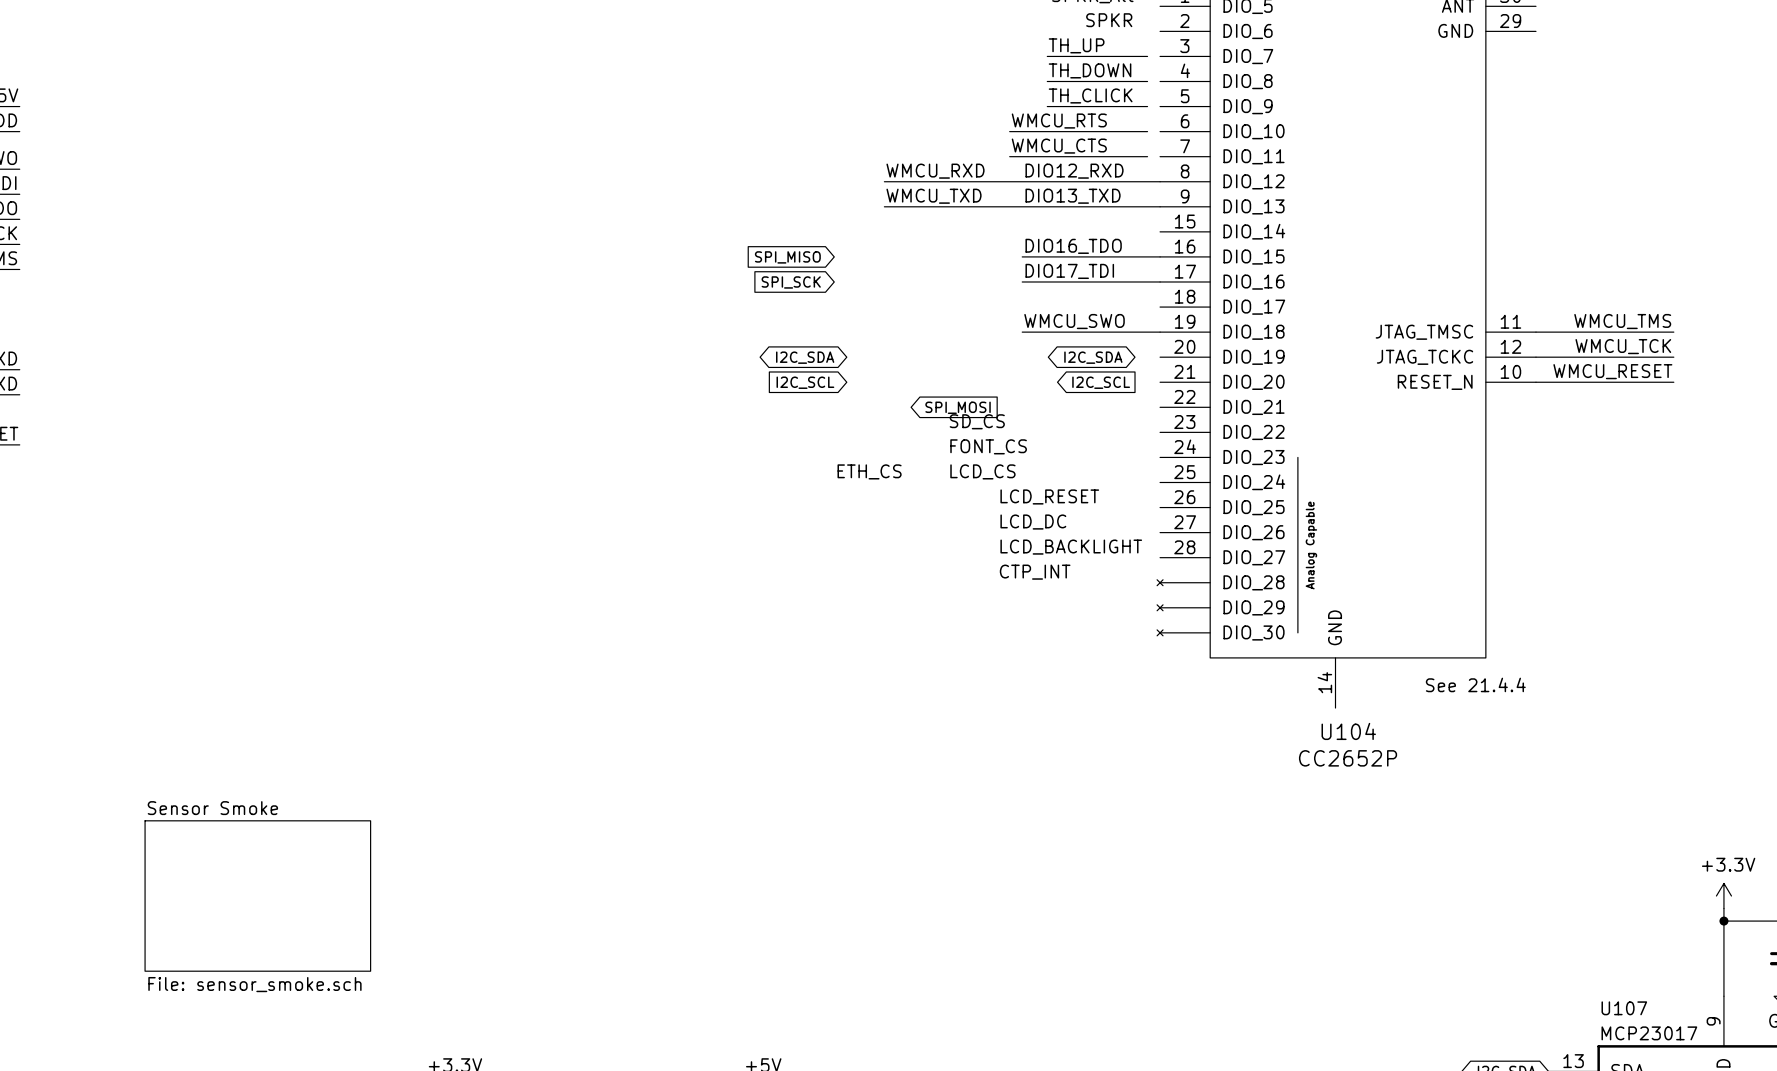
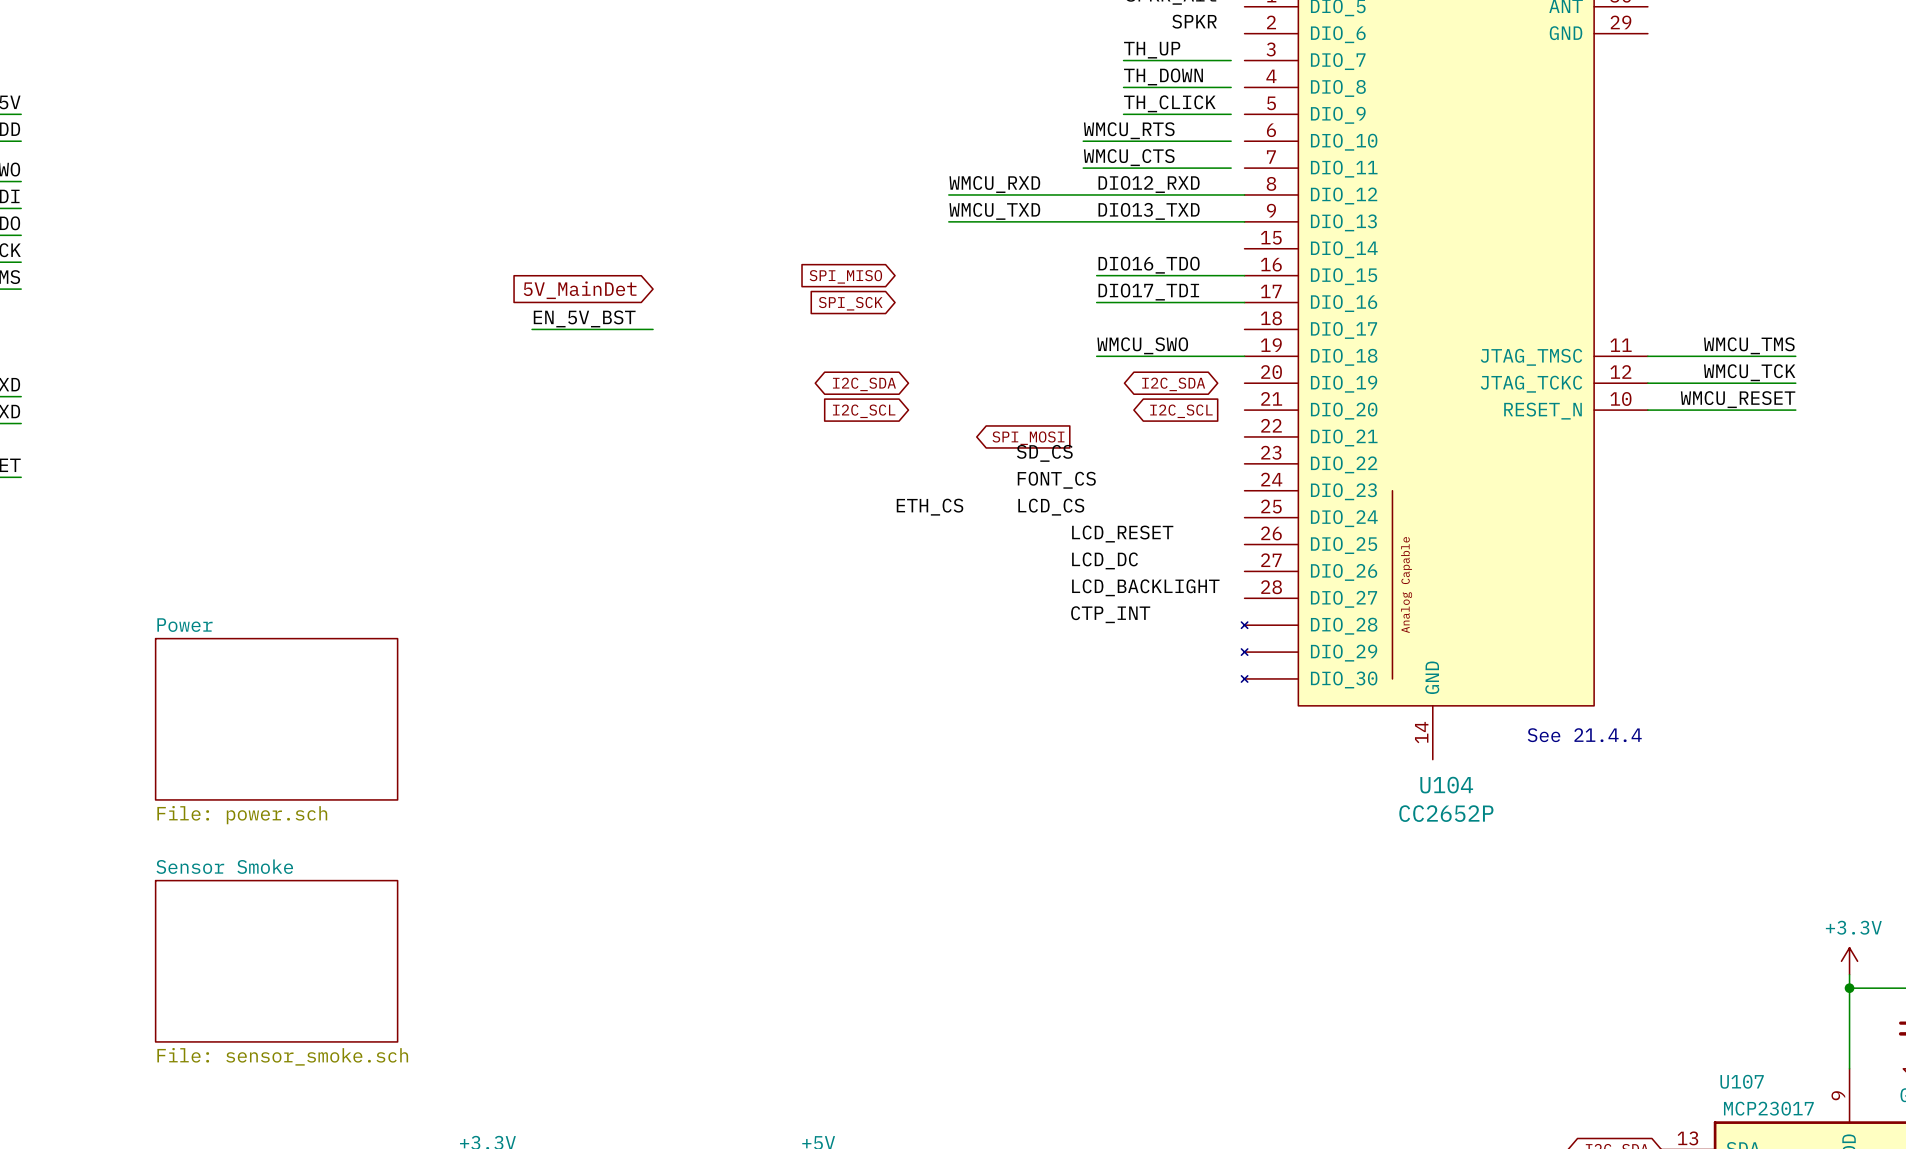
global label: none -> 5V_MainDet (580, 290)
label: none -> EN_5V_BST (584, 318)
wire: none -> (532, 329) (653, 329)
sheet Power: none -> File: power.sch (276, 719)

